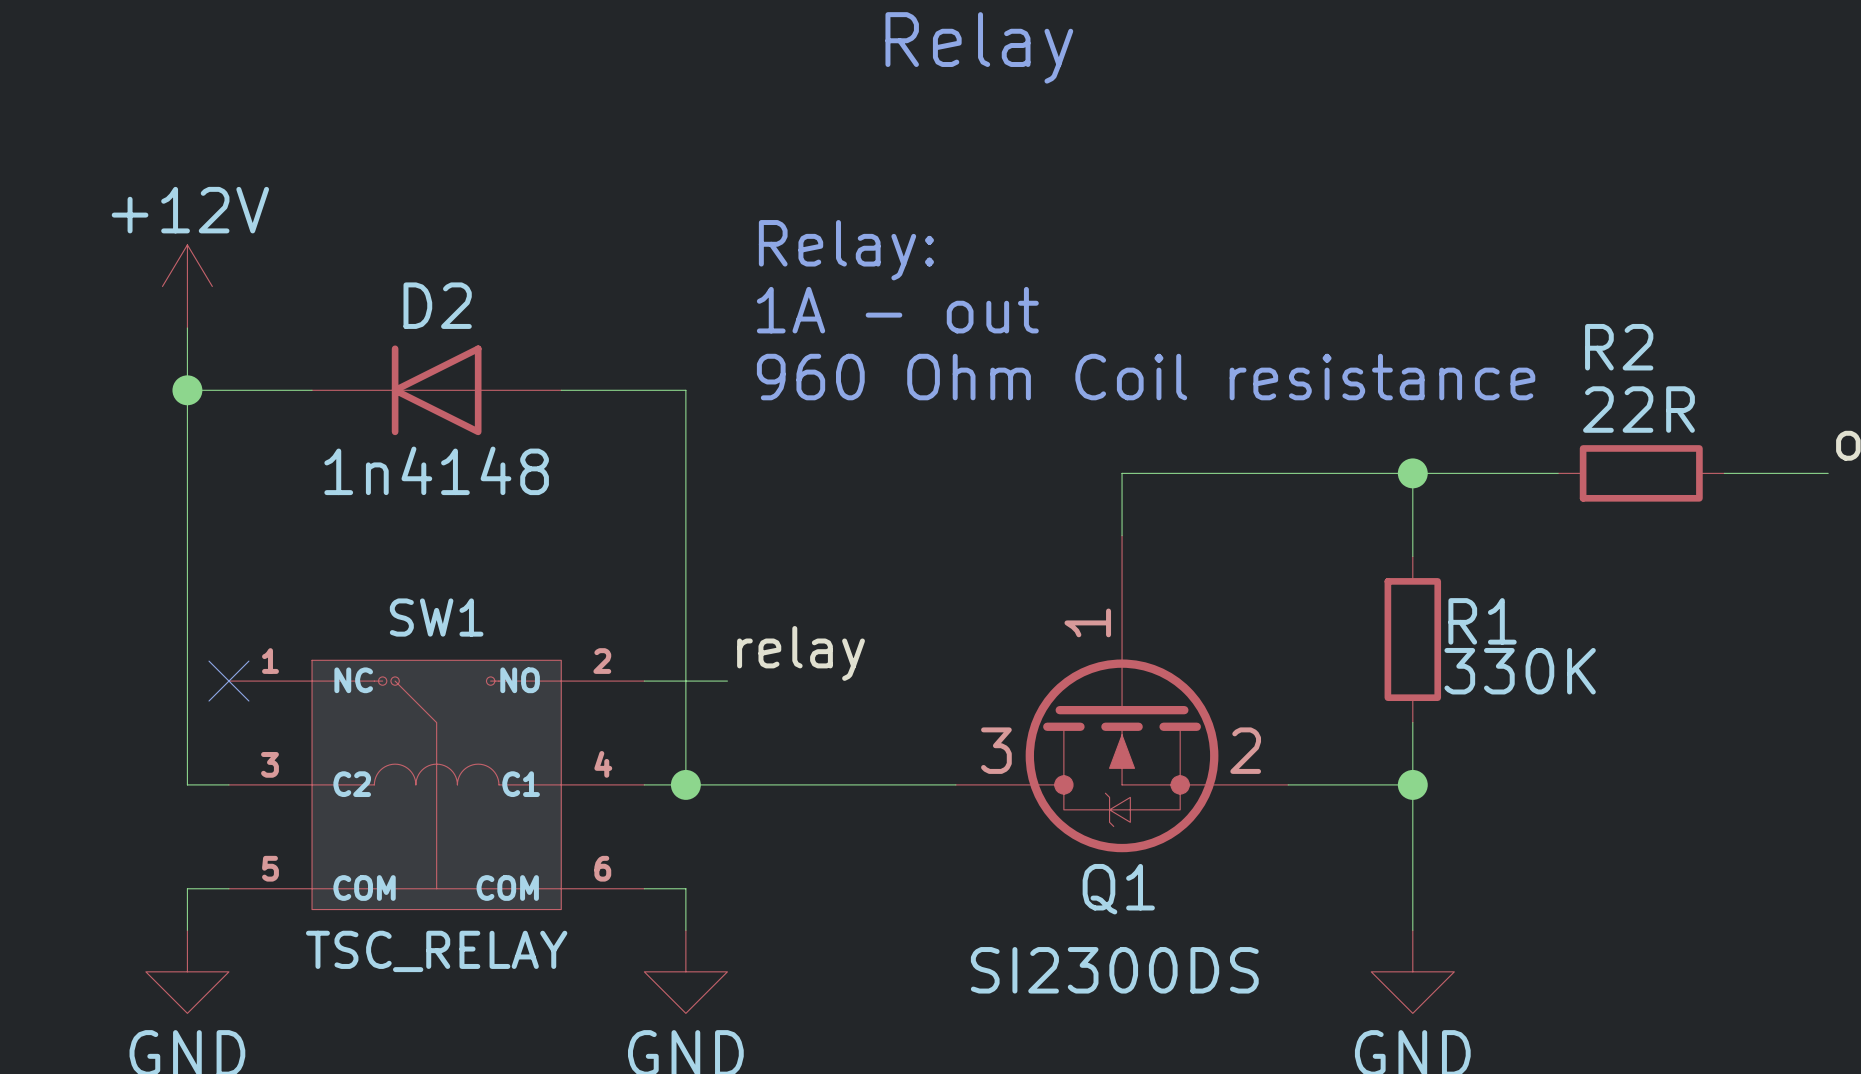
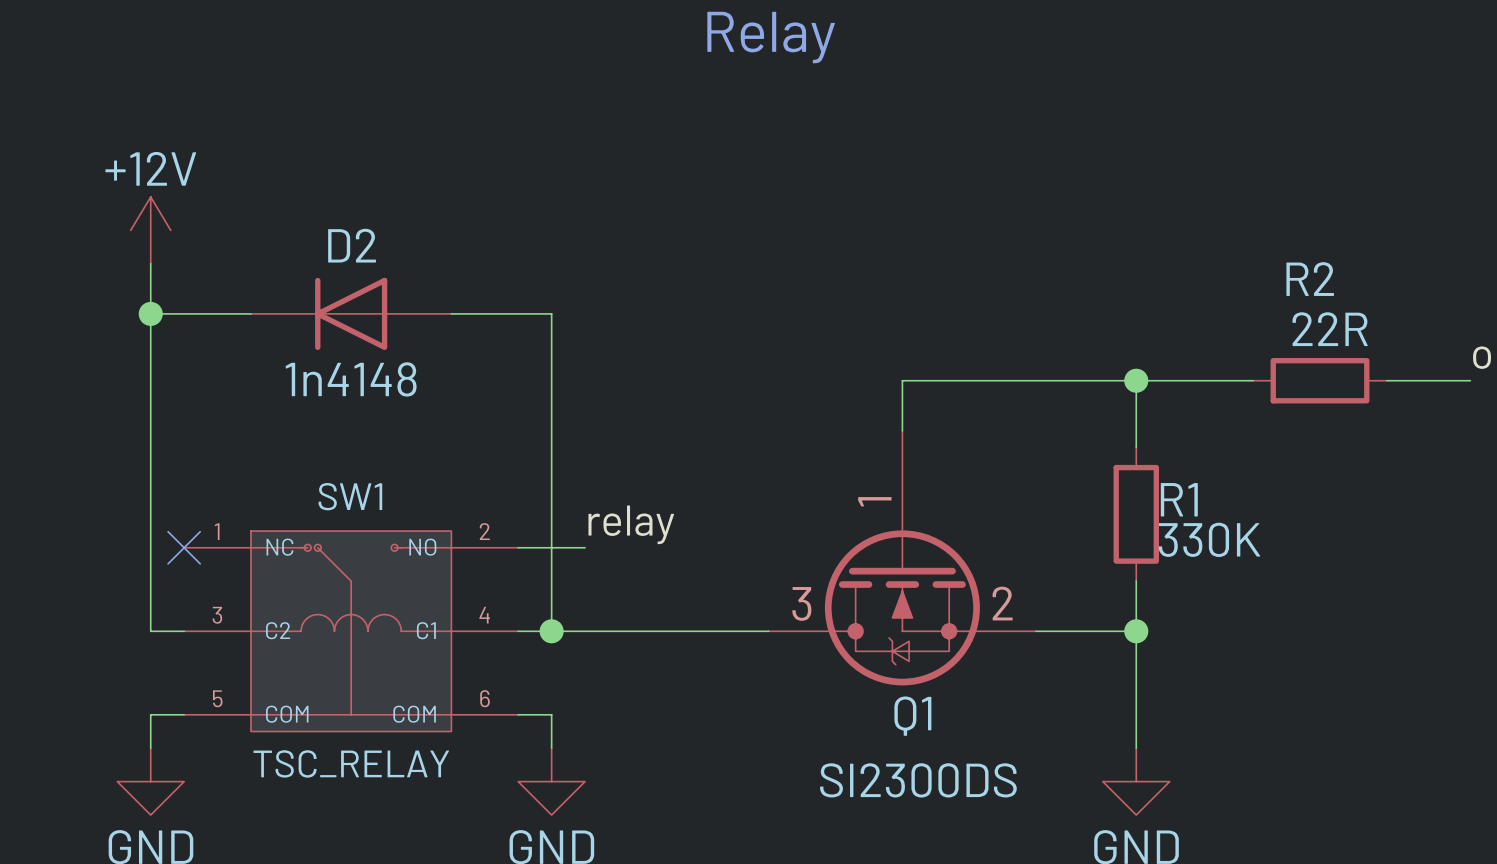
text: Relay: (846, 250) -> none
text: 1A - out (897, 310) -> none
text: 960 Ohm Coil resistance (1146, 377) -> none

